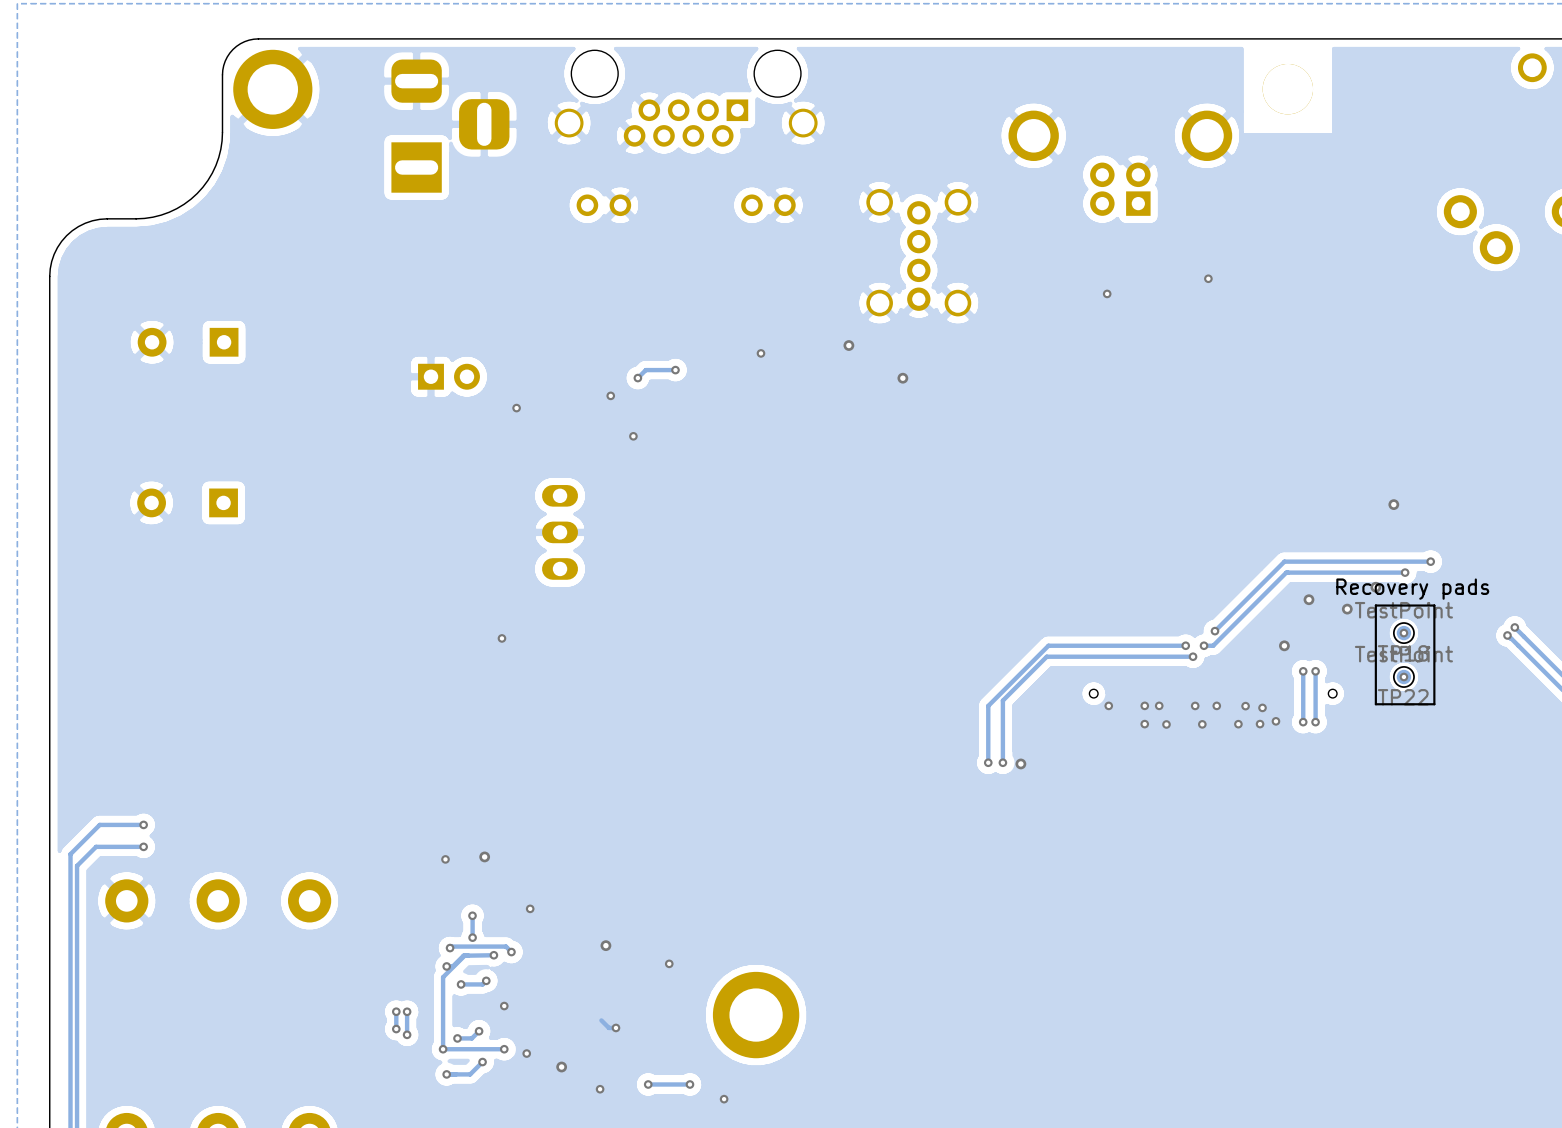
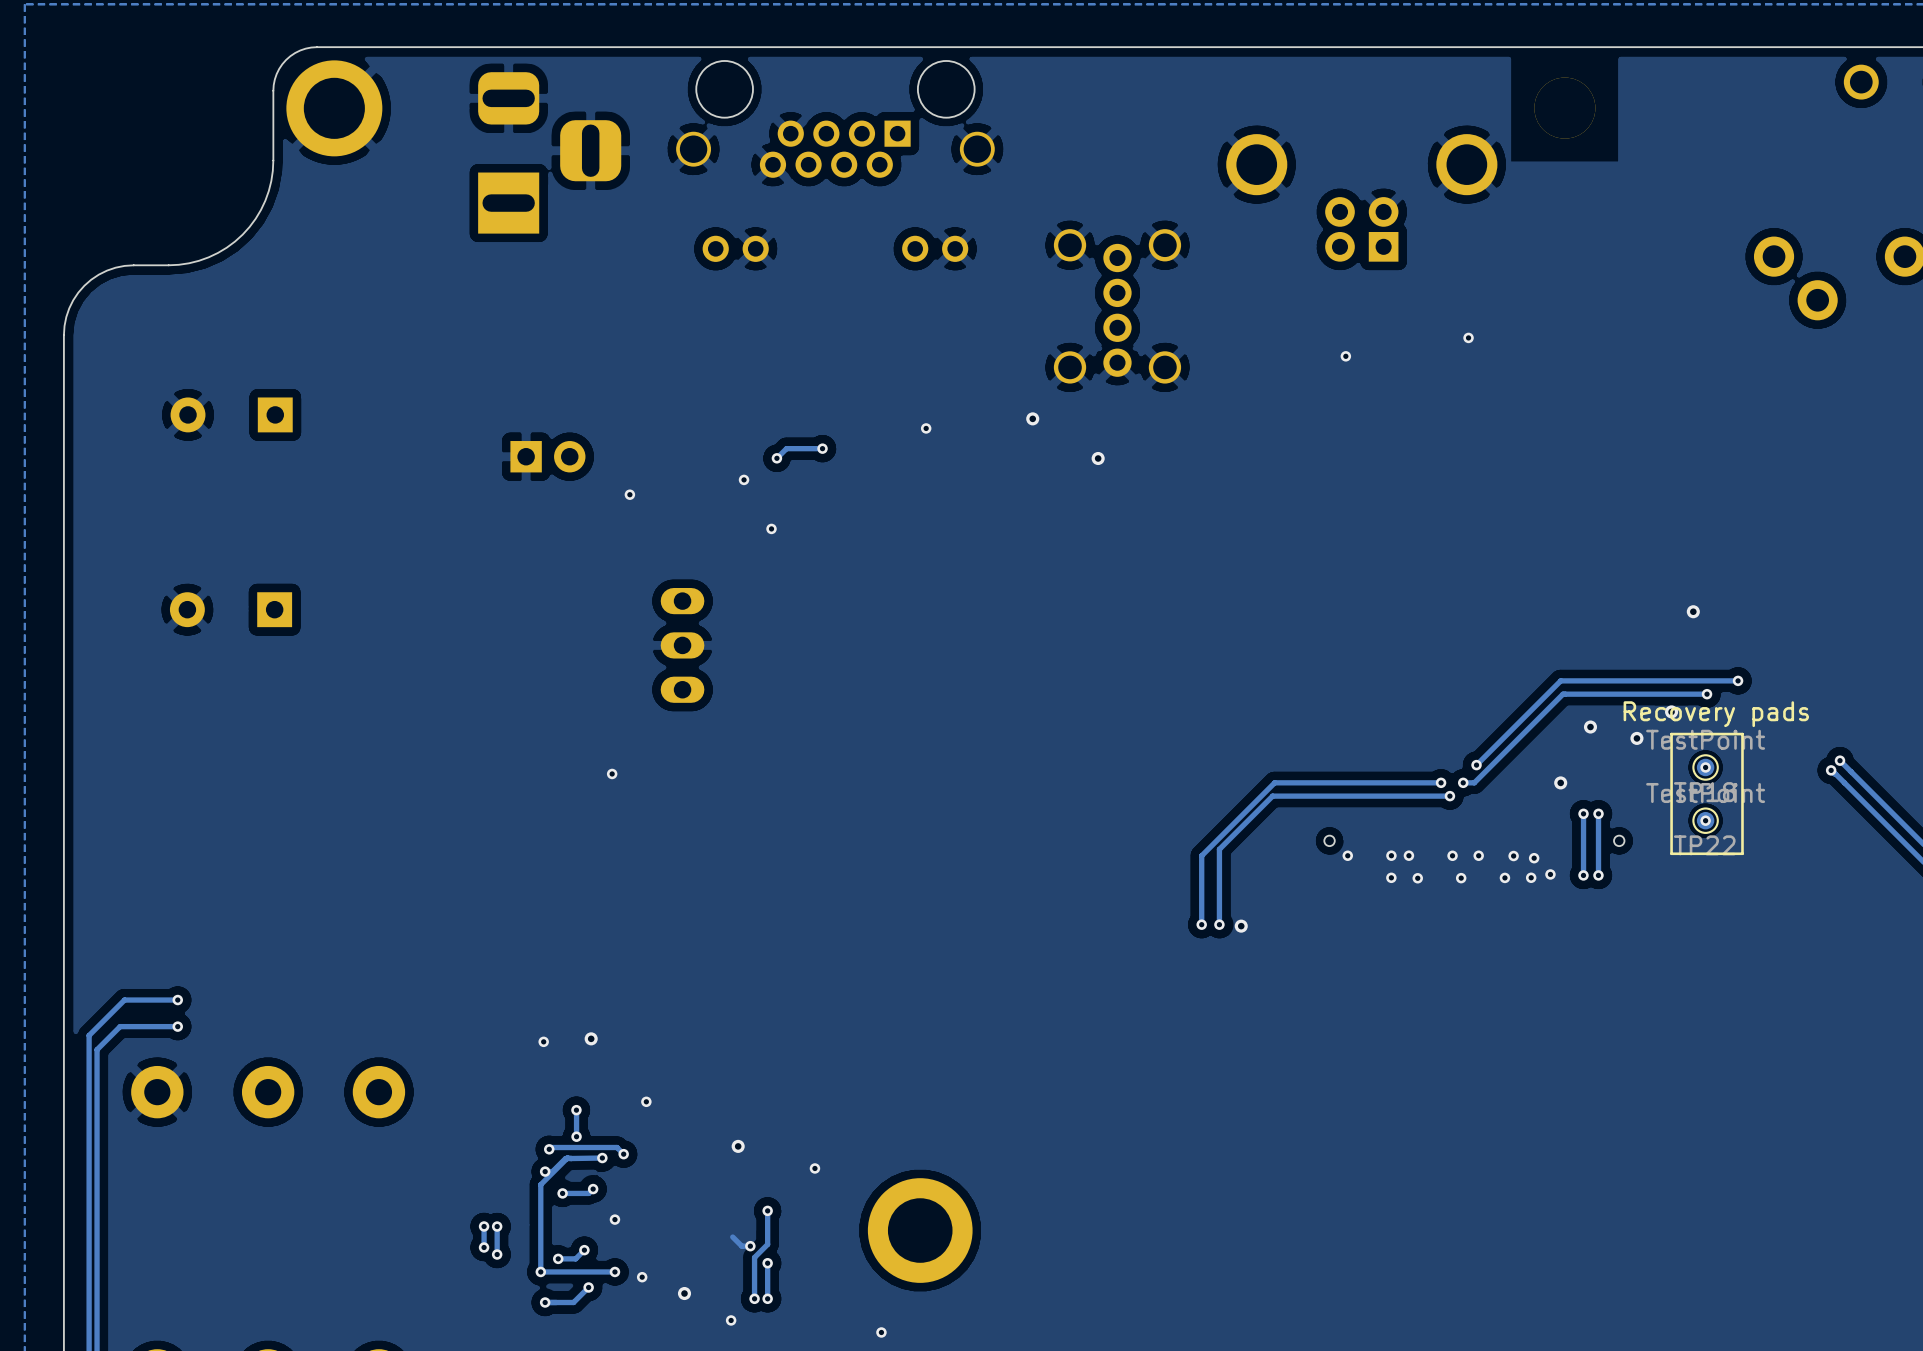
track: none -> (767, 1210) (767, 1244) (754, 1257) (754, 1298)
via: none -> (767, 1210)
track: none -> (767, 1263) (767, 1298)
via: none -> (767, 1263)
via: none -> (754, 1298)
via: none -> (767, 1298)
via: (648, 1084) -> none
track: (689, 1084) (648, 1084) -> none
via: (689, 1084) -> none

